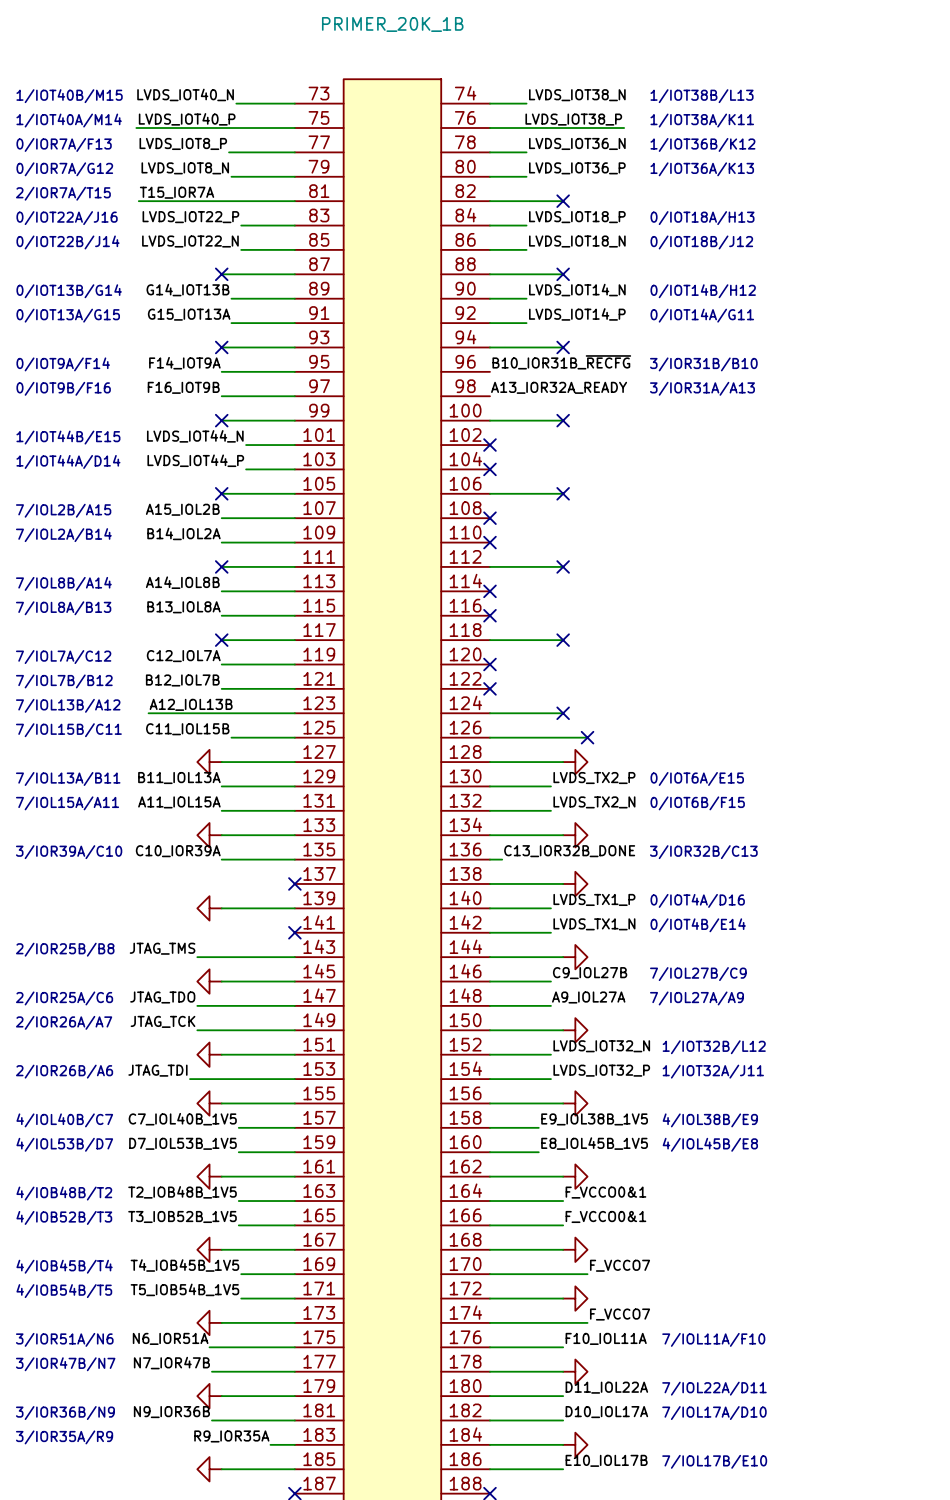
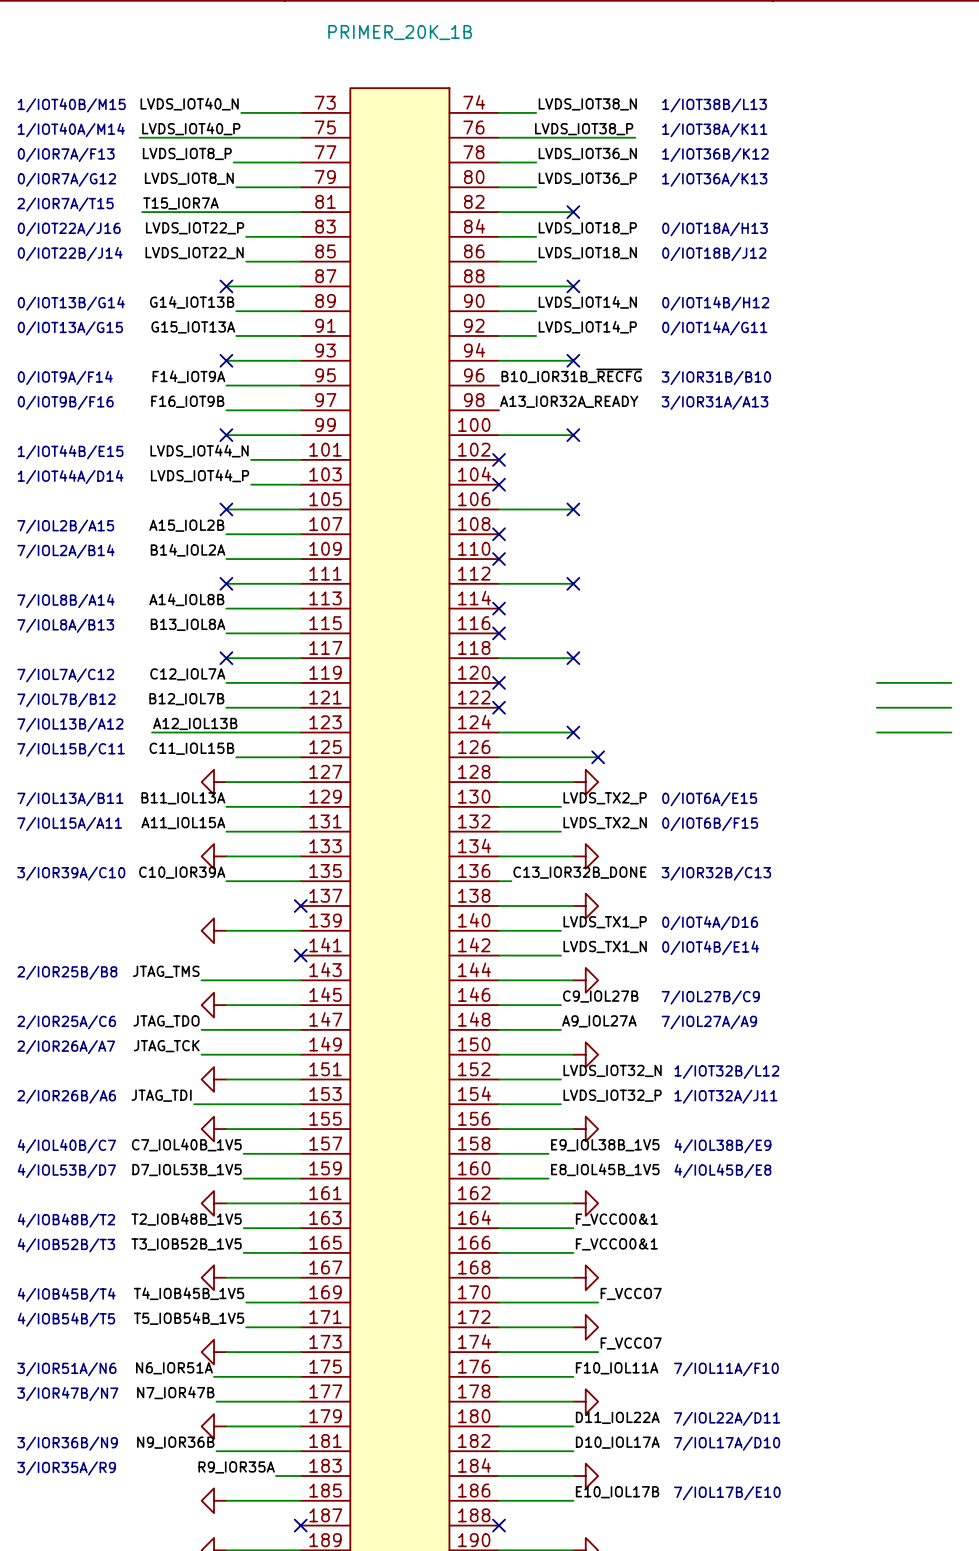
wire: none -> (876, 682) (951, 682)
wire: none -> (876, 707) (951, 707)
wire: none -> (876, 732) (951, 732)

